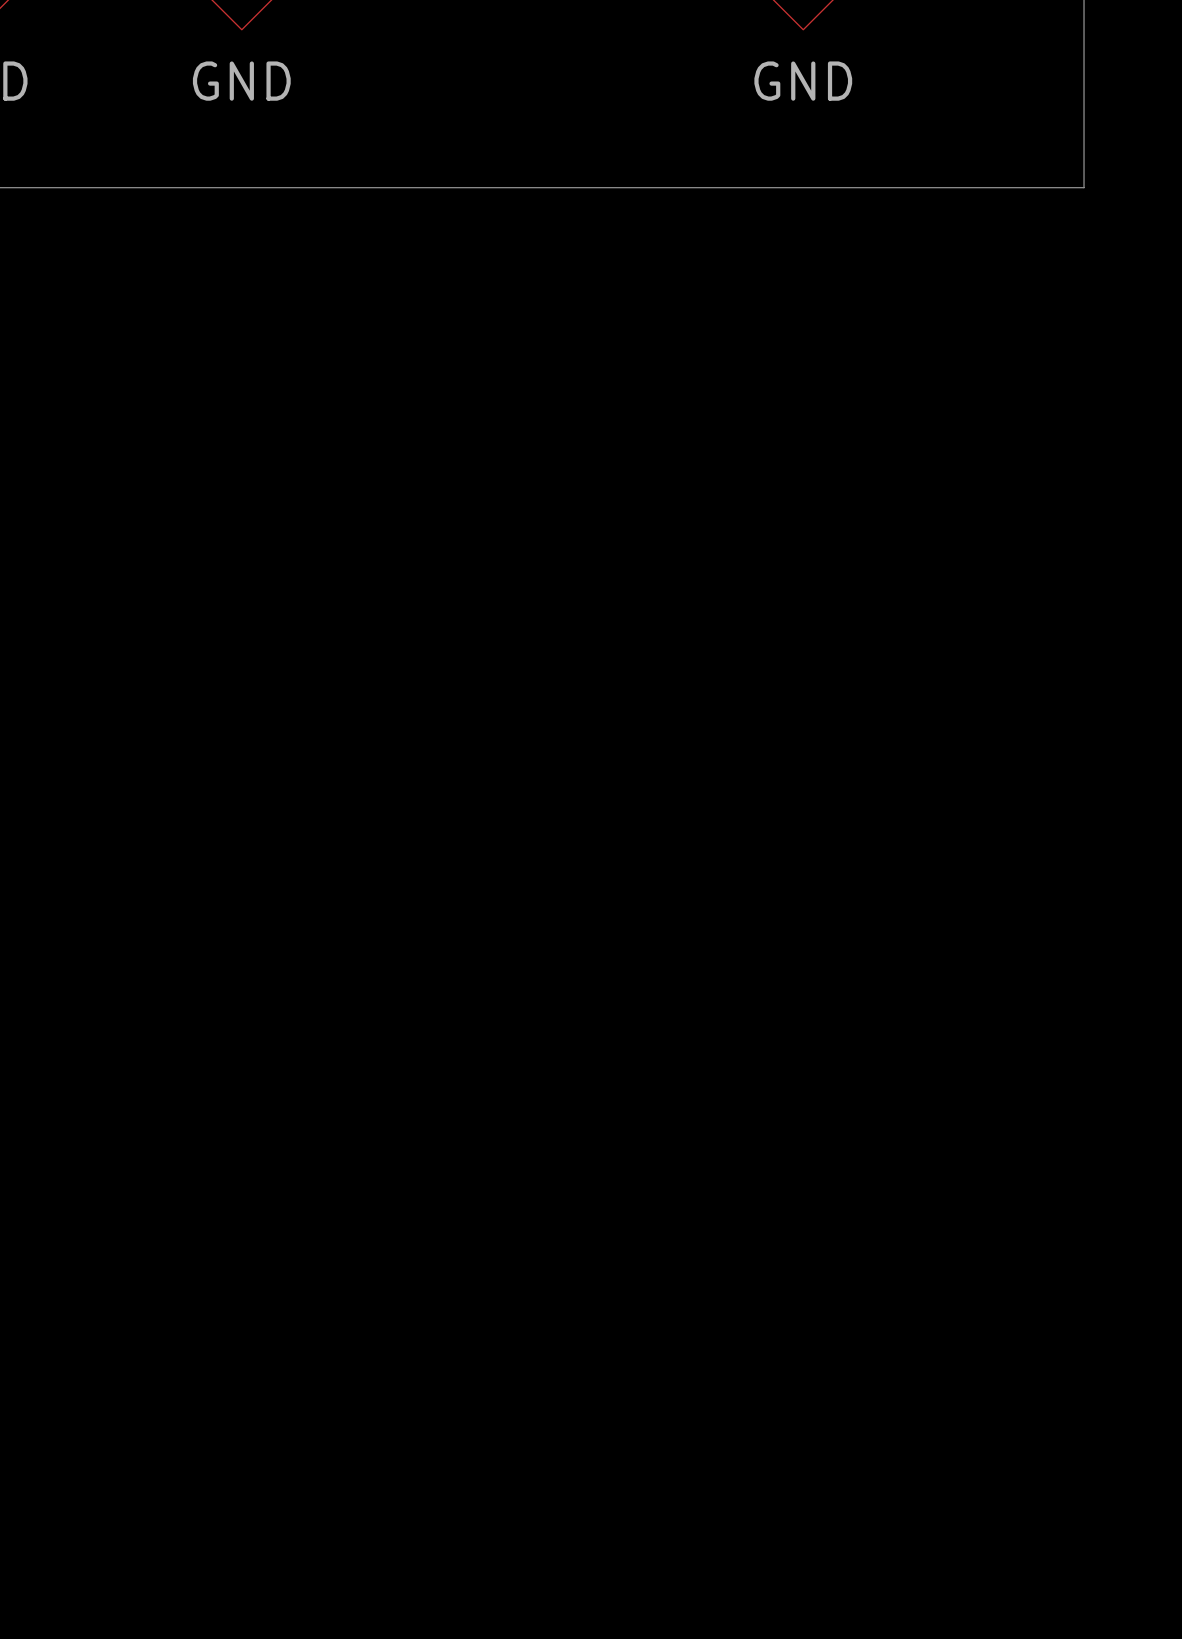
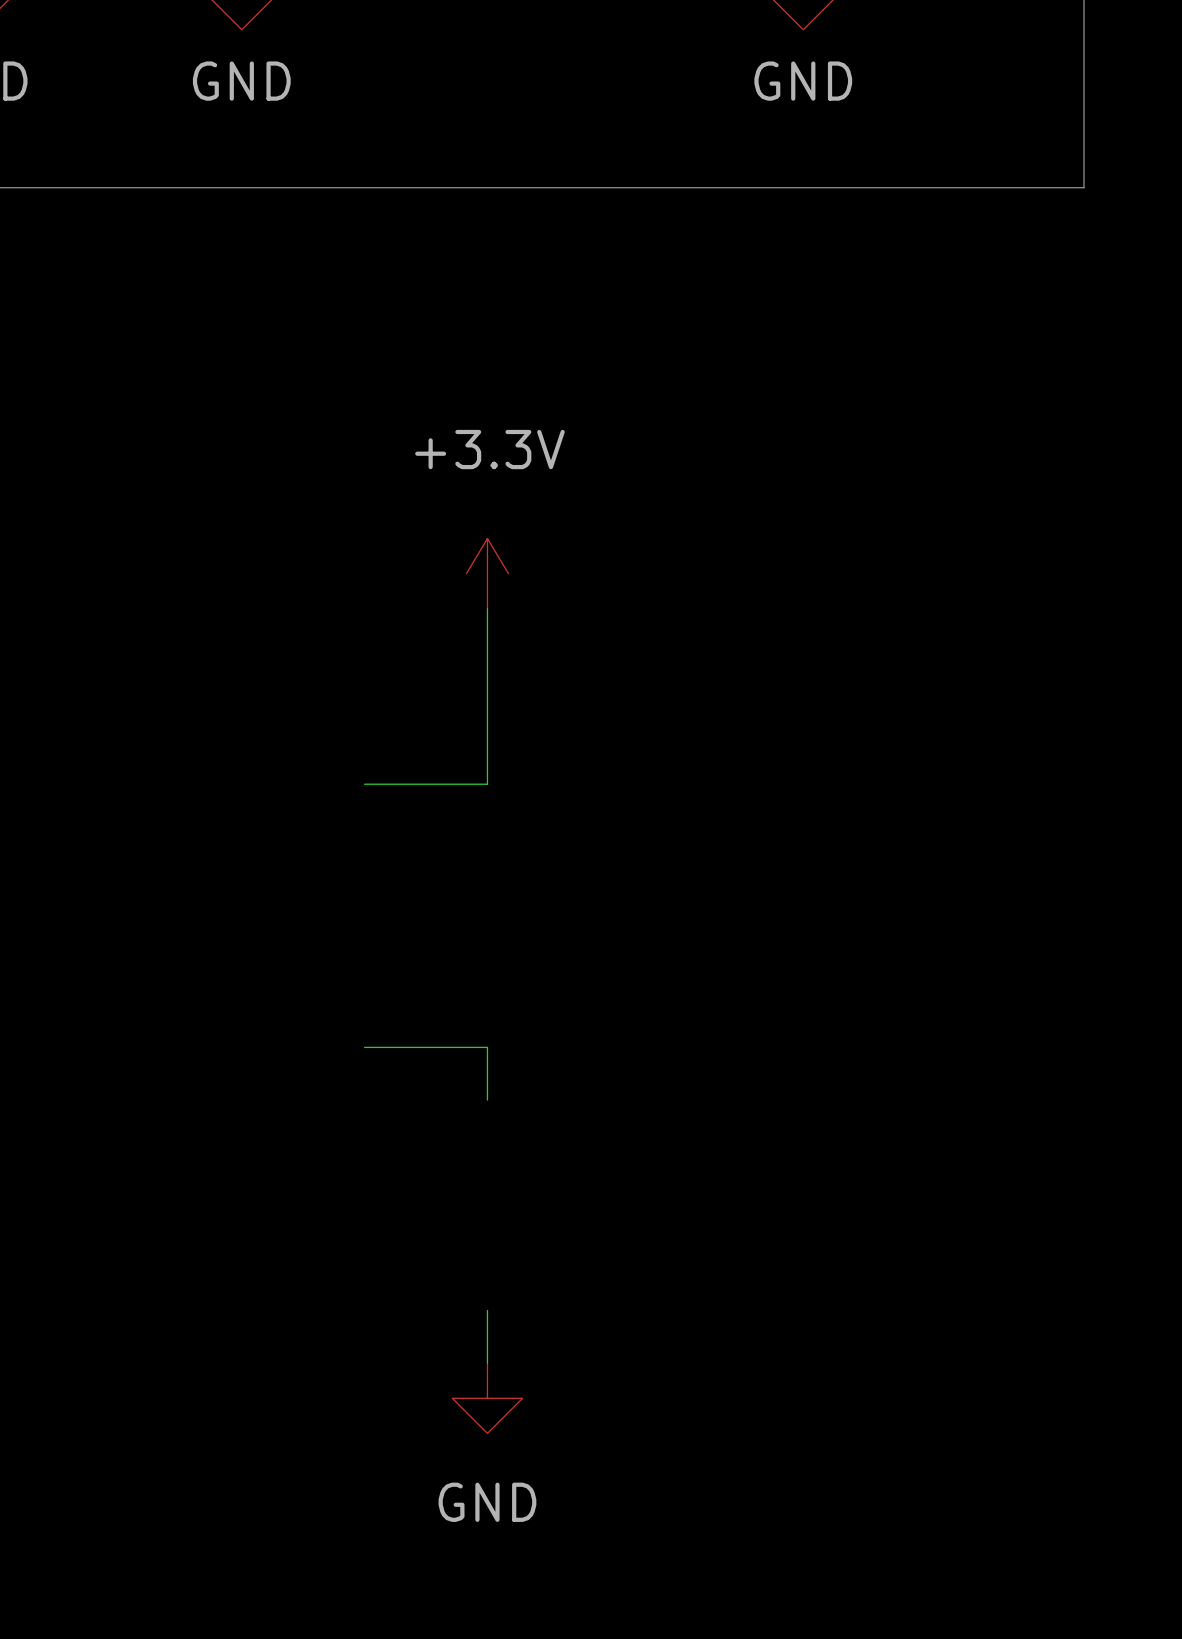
power symbol: none -> +3.3V (487, 573)
wire: none -> (487, 608) (487, 784) (364, 784)
wire: none -> (364, 1047) (487, 1047) (487, 1100)
wire: none -> (487, 1310) (487, 1363)
power symbol: none -> GND (487, 1398)

